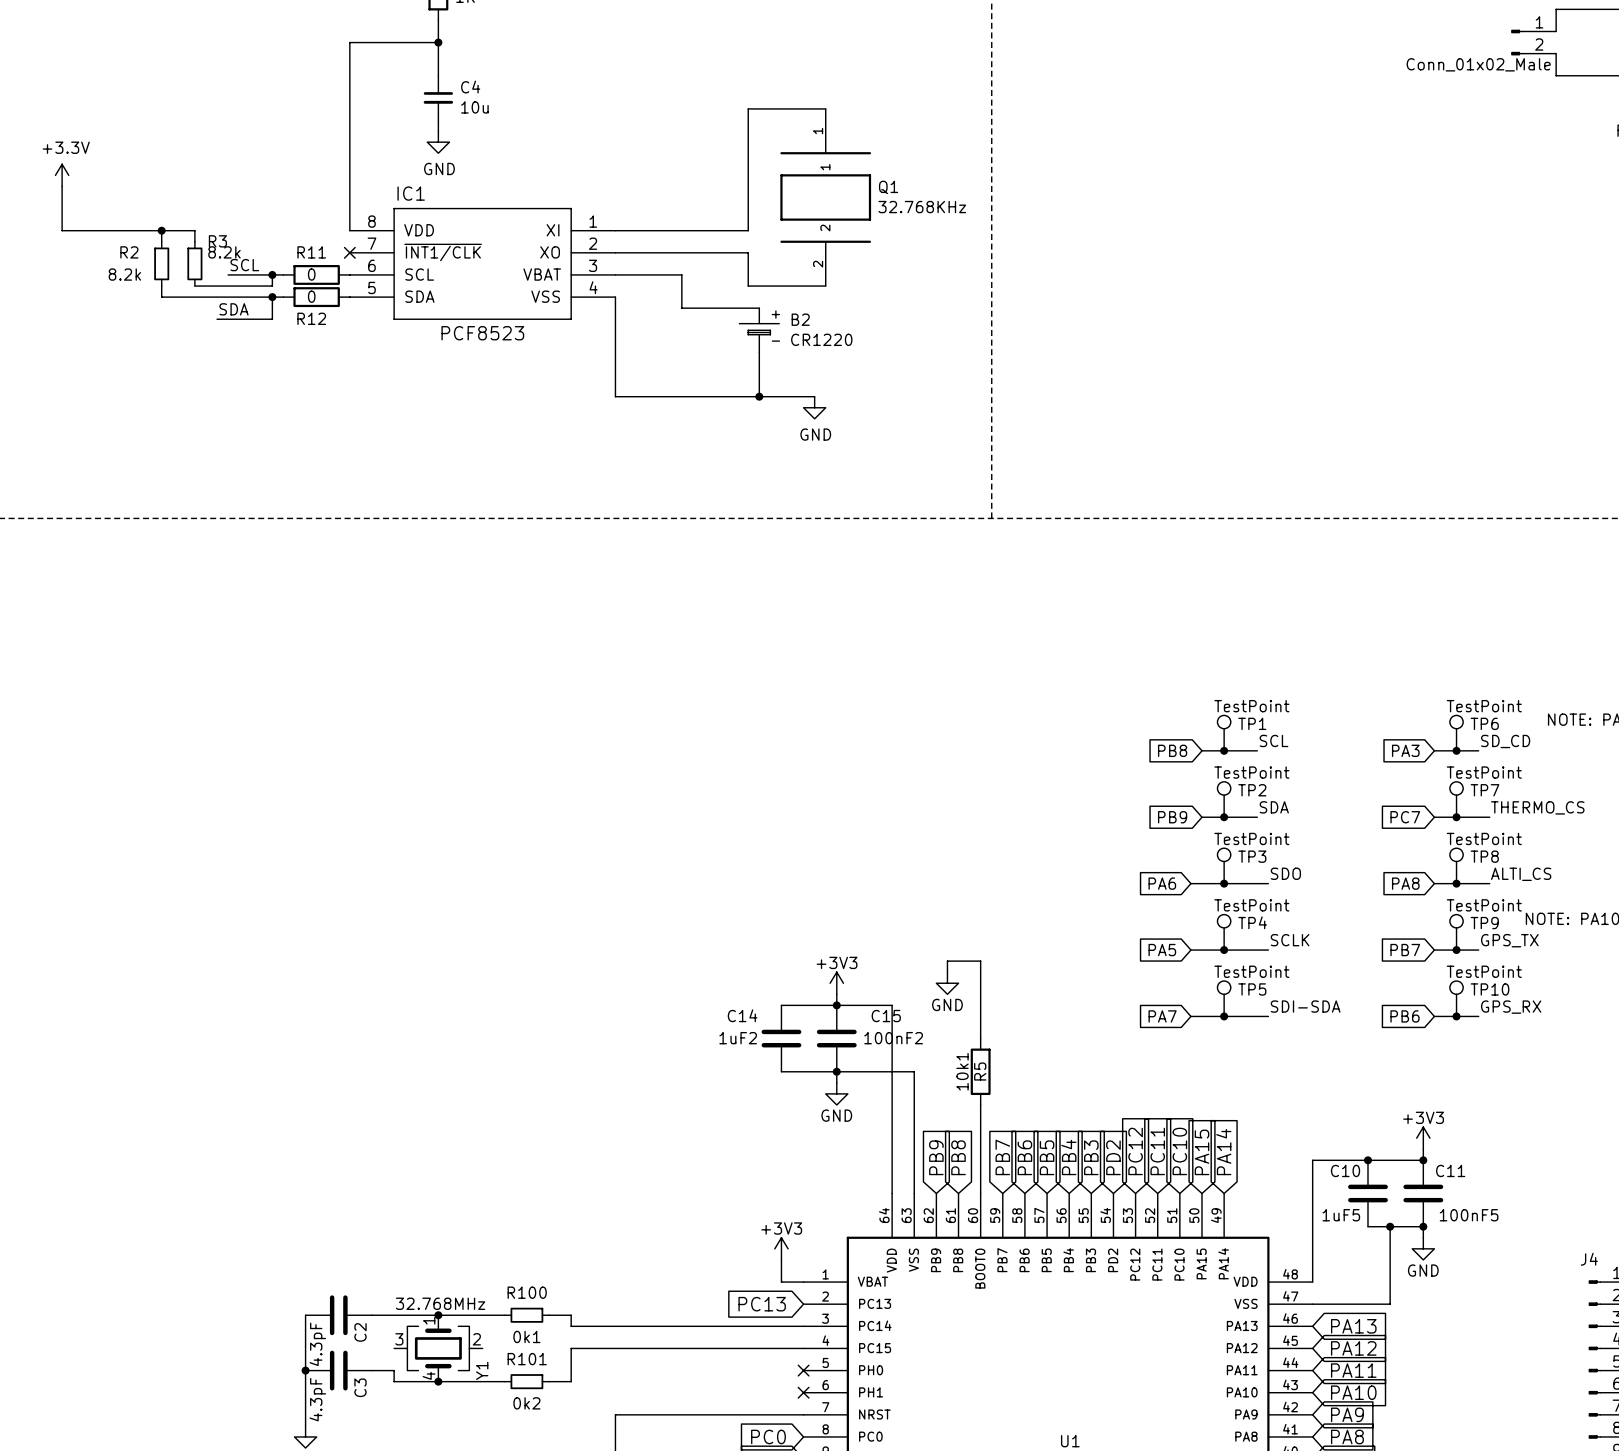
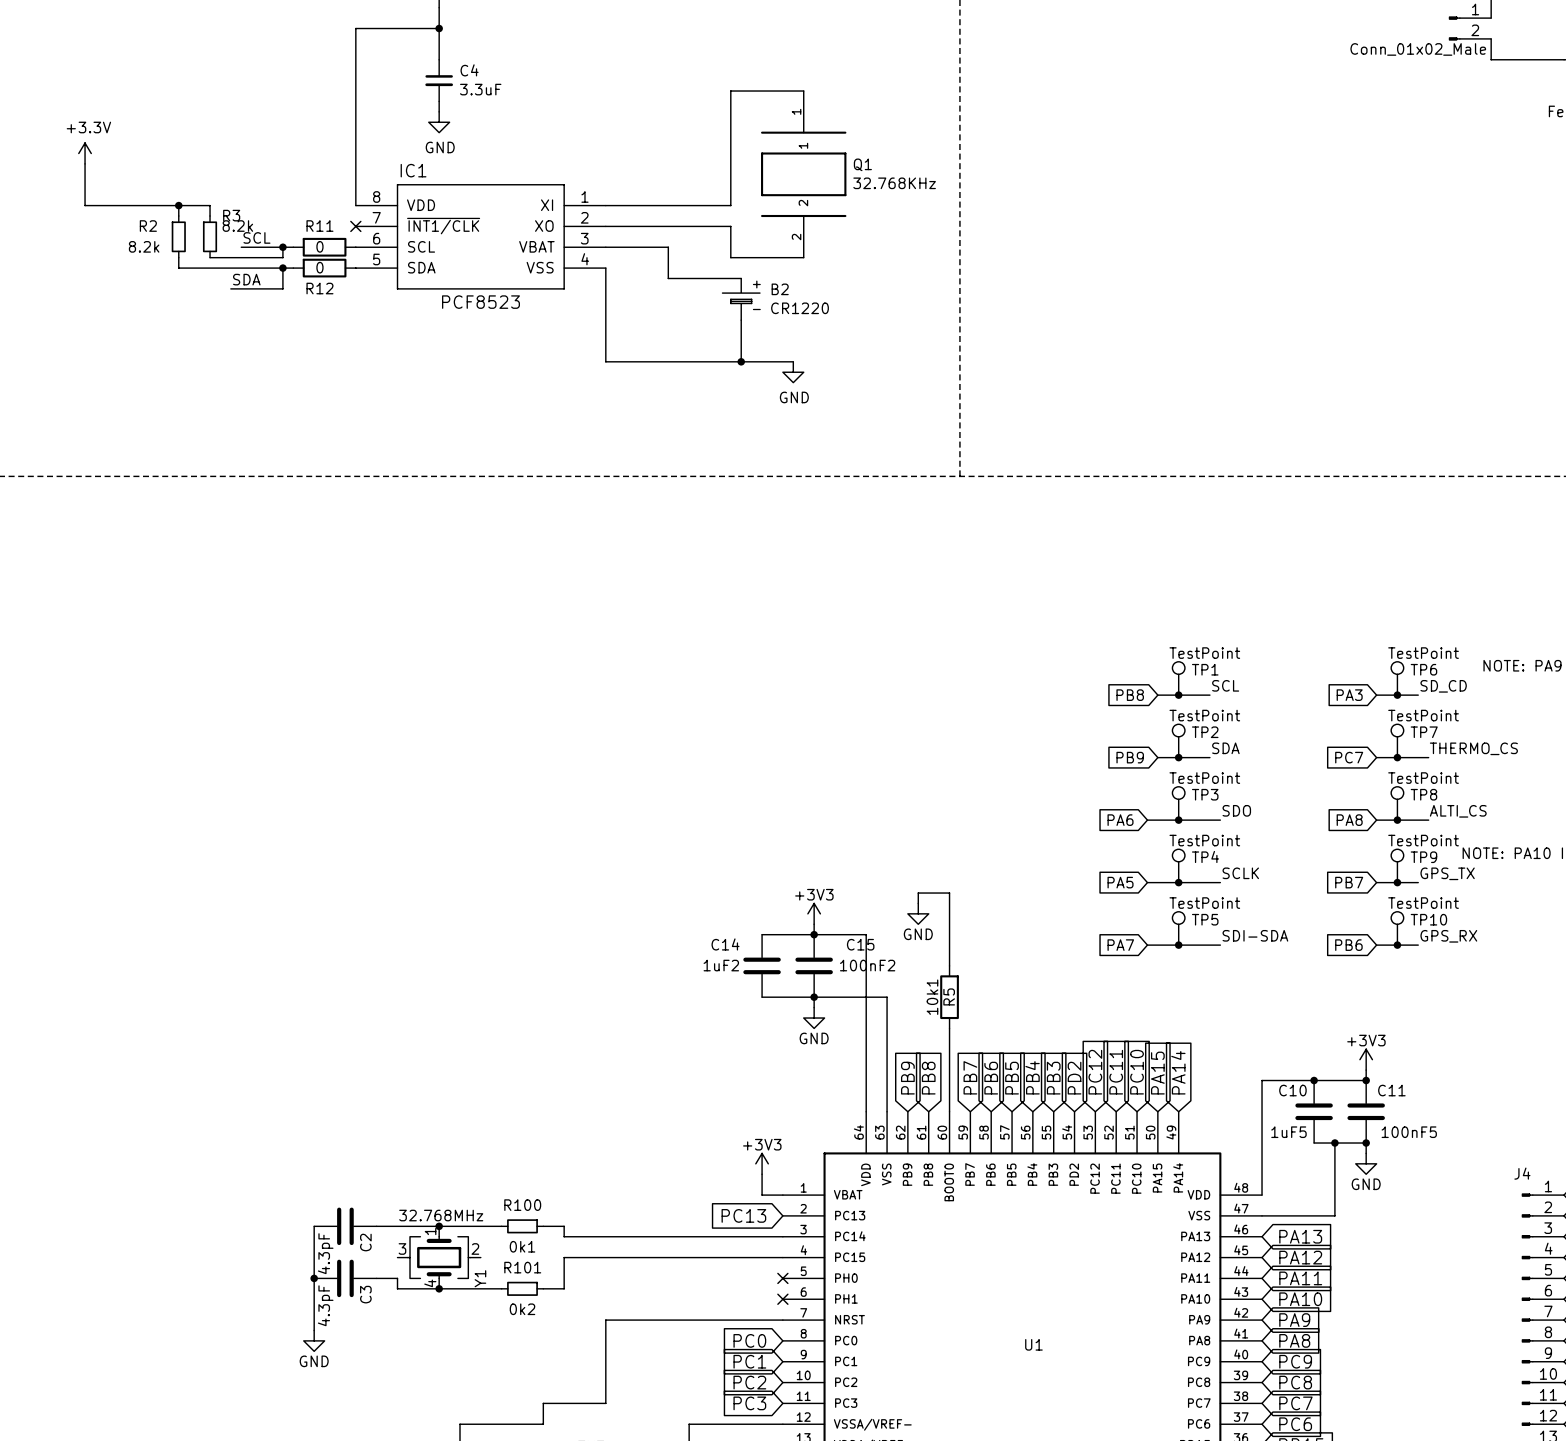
C4 value: 10u (474, 107) -> 3.3uF (480, 89)

